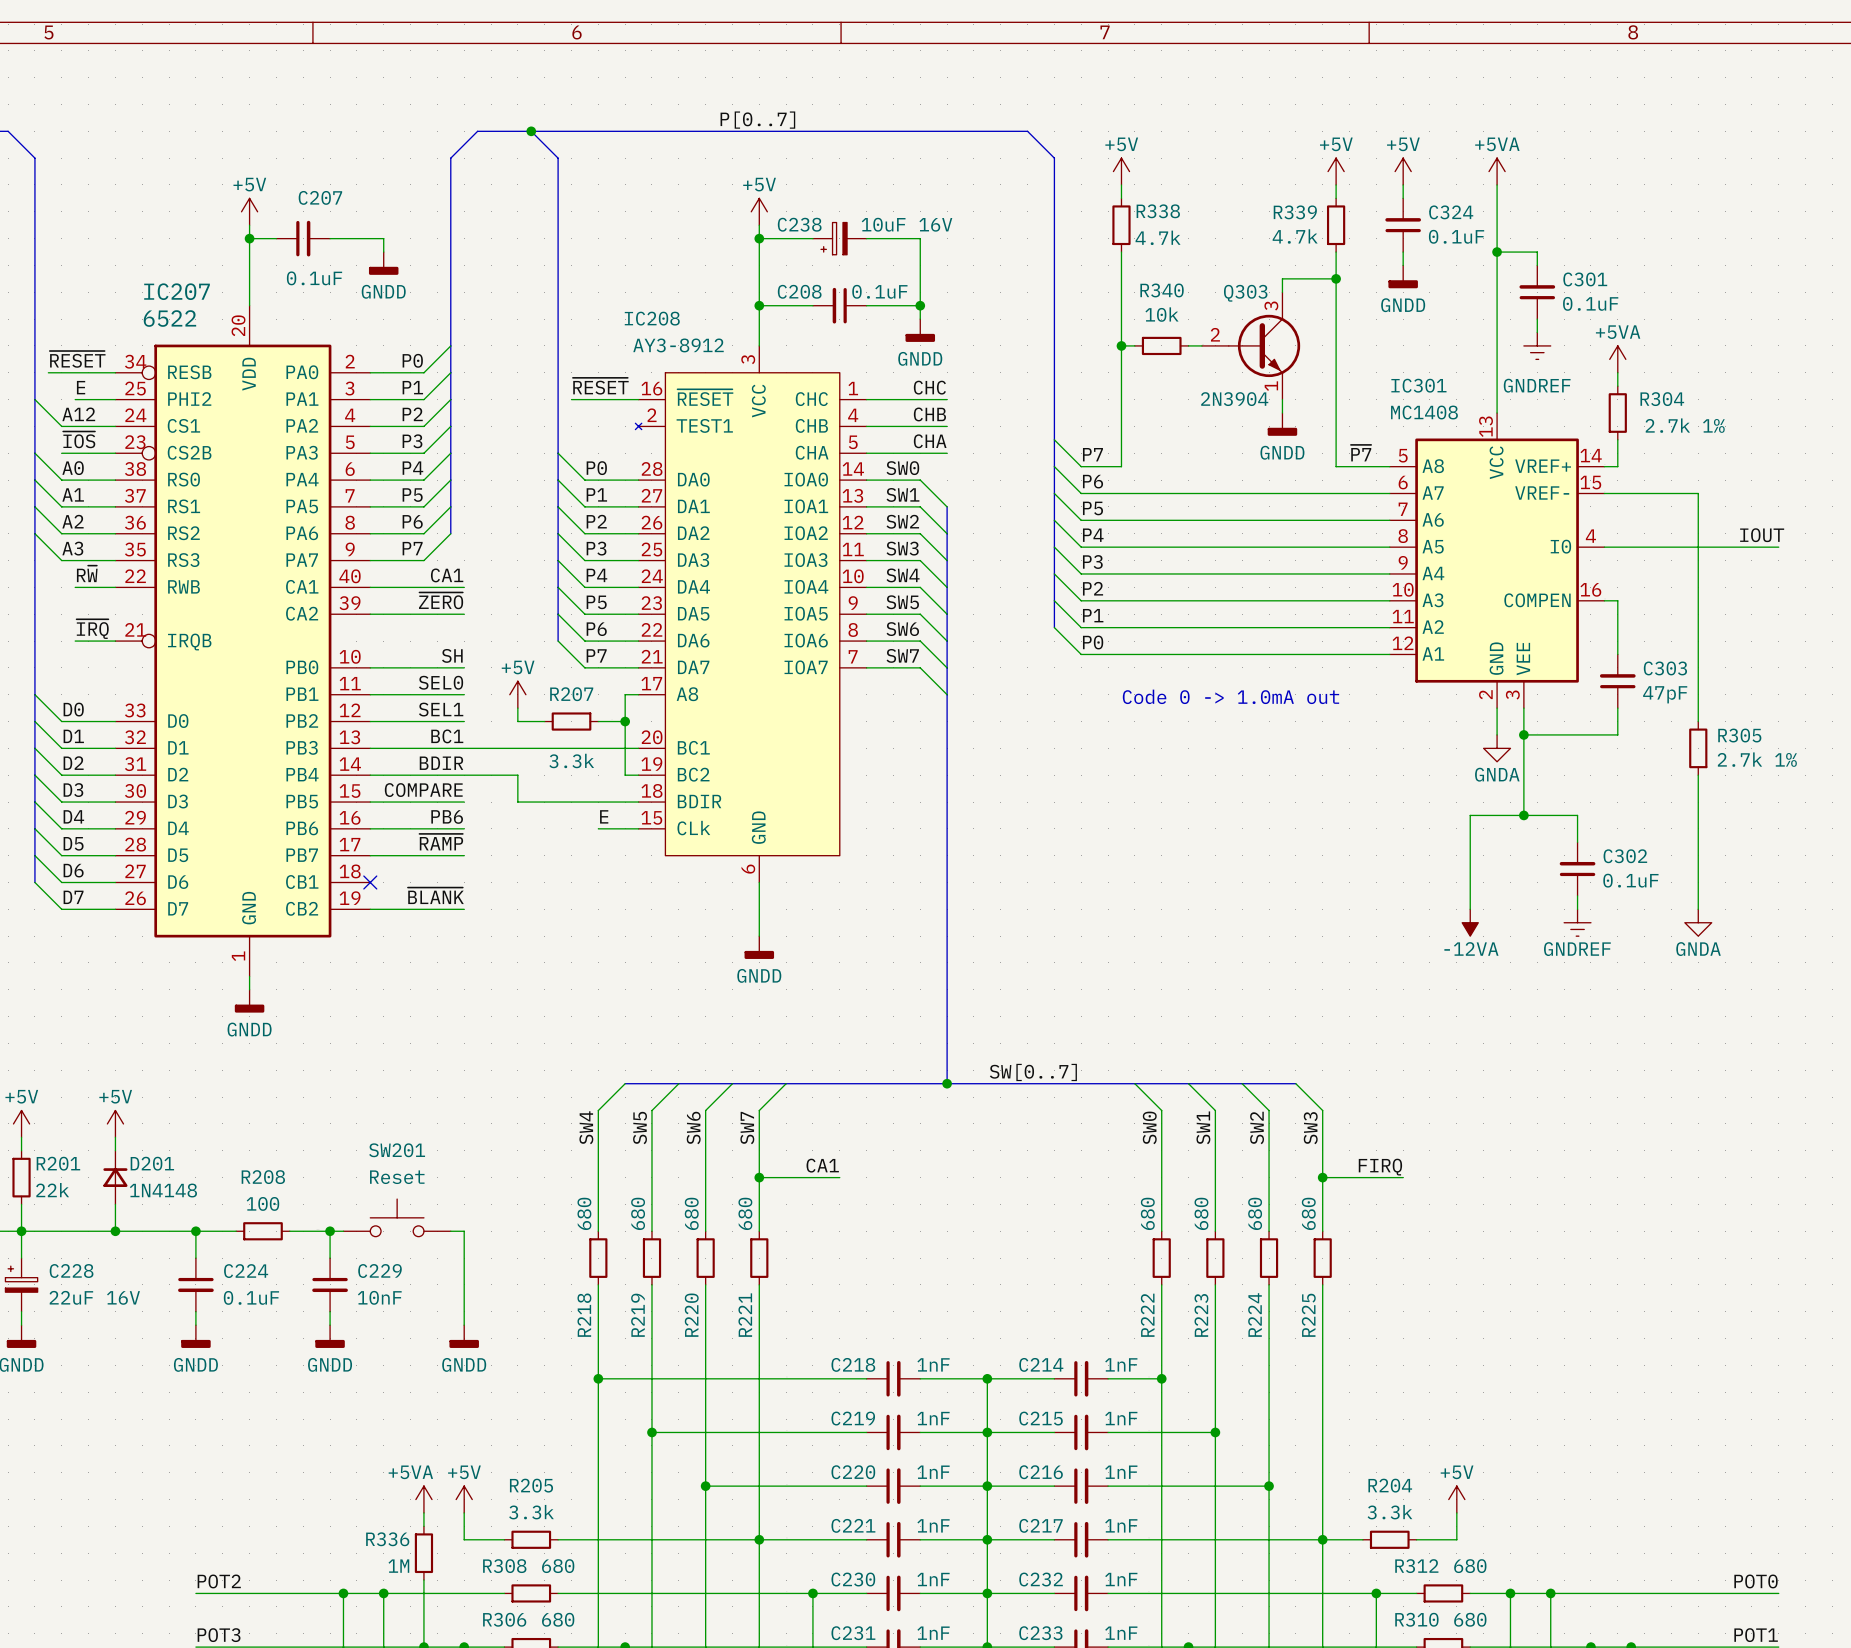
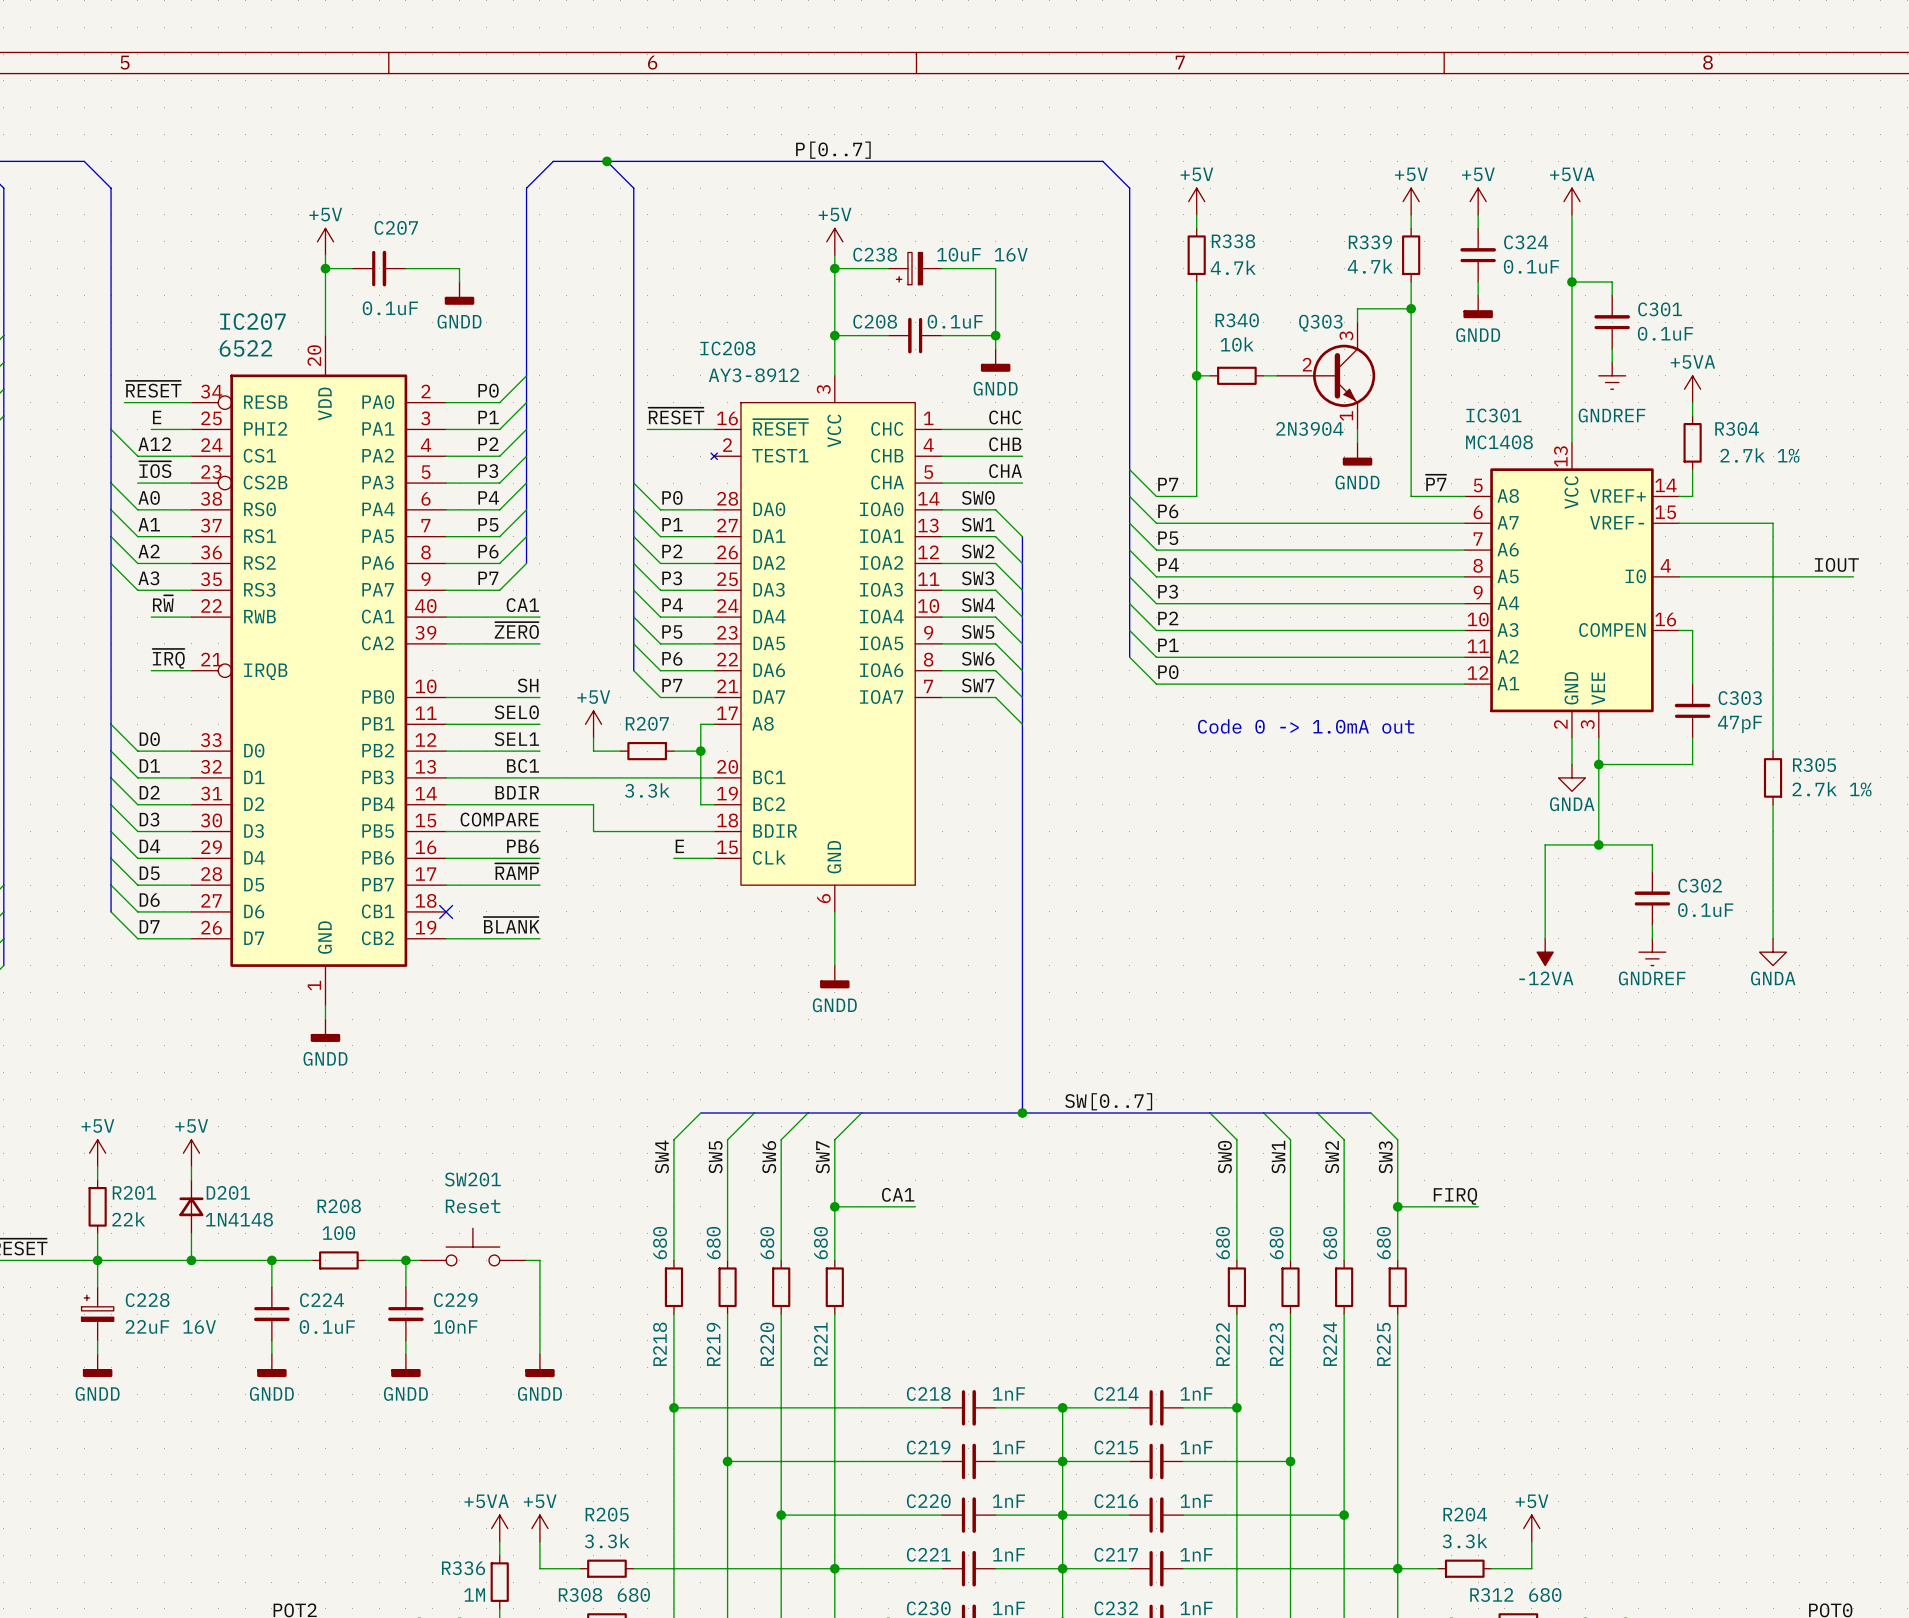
Q303 symbol: [1201, 292, 1301, 400] -> [1277, 322, 1376, 430]

